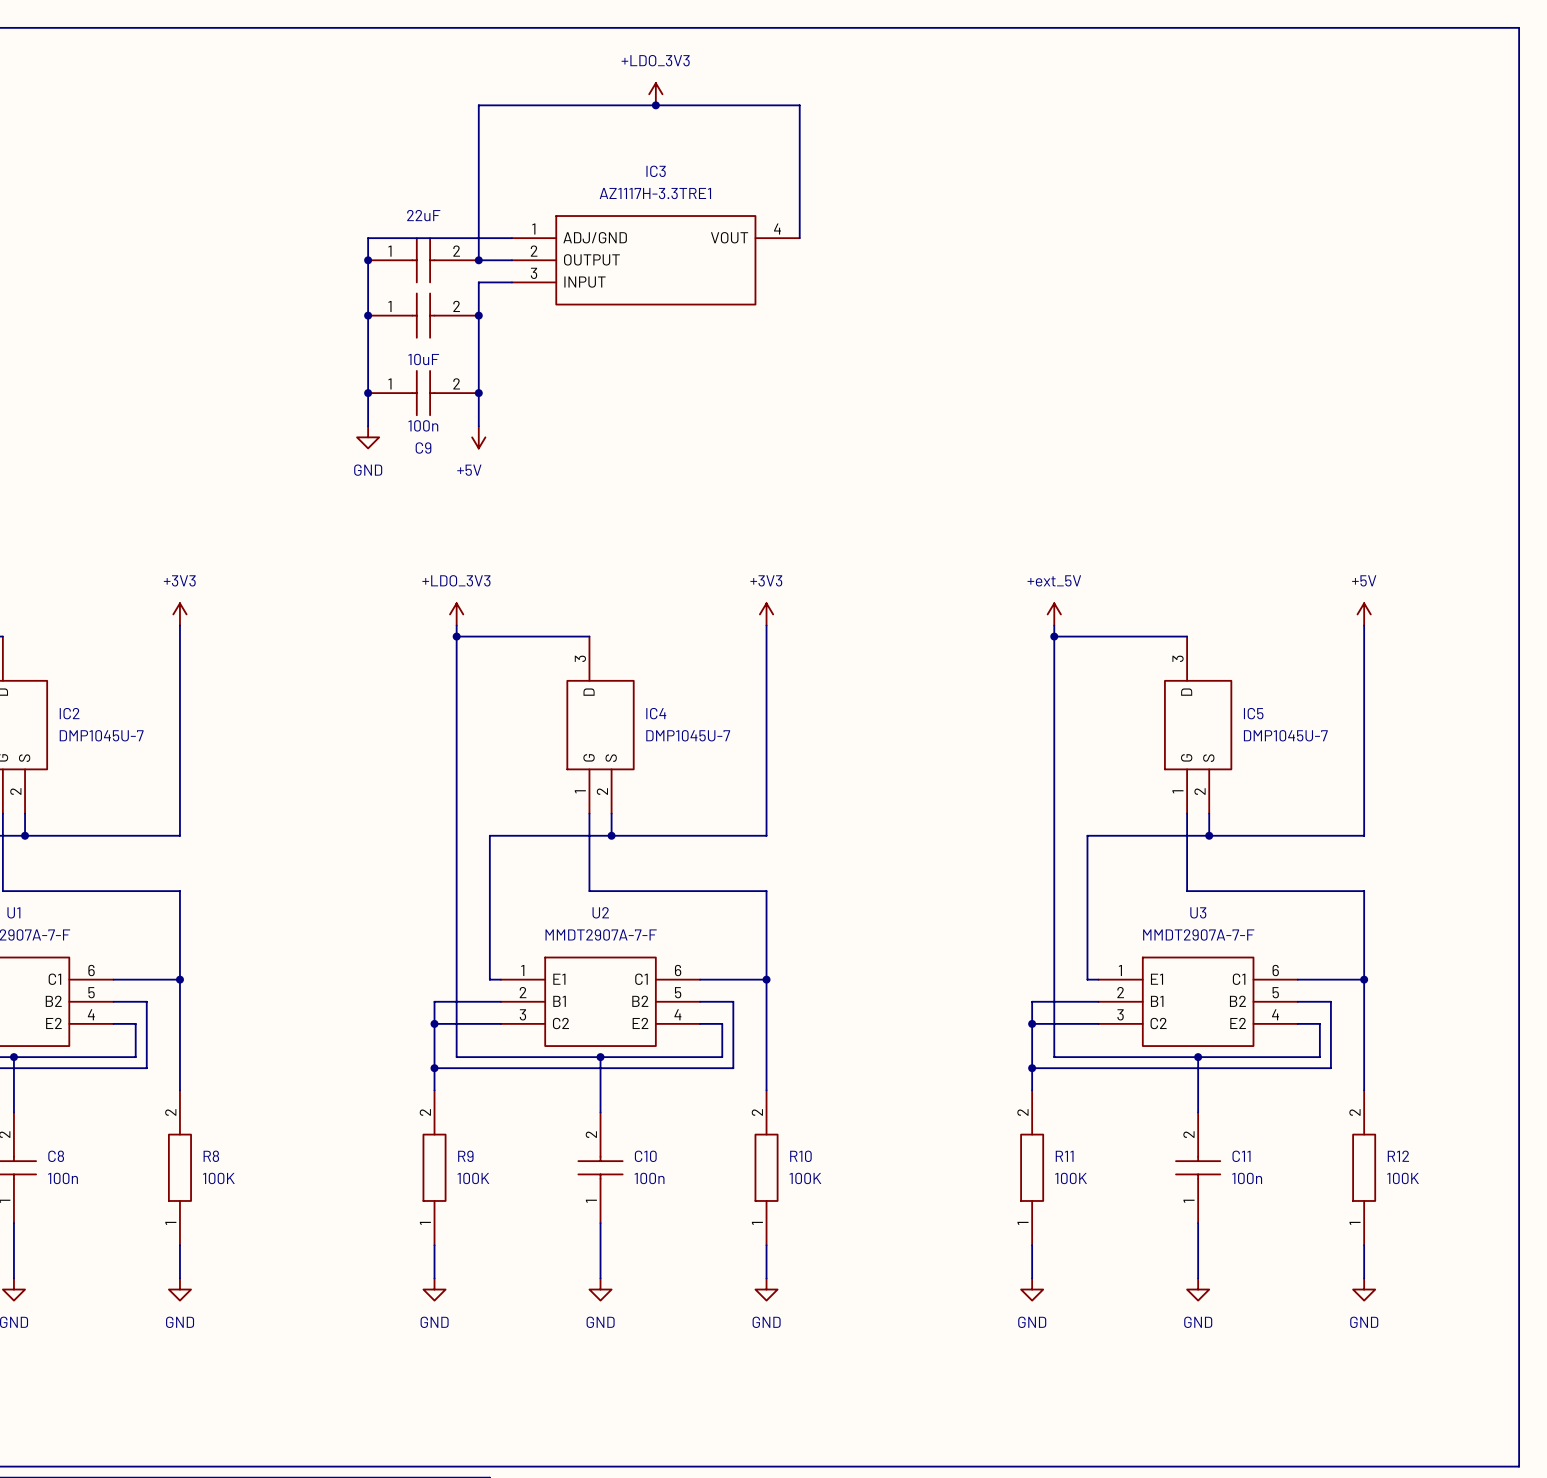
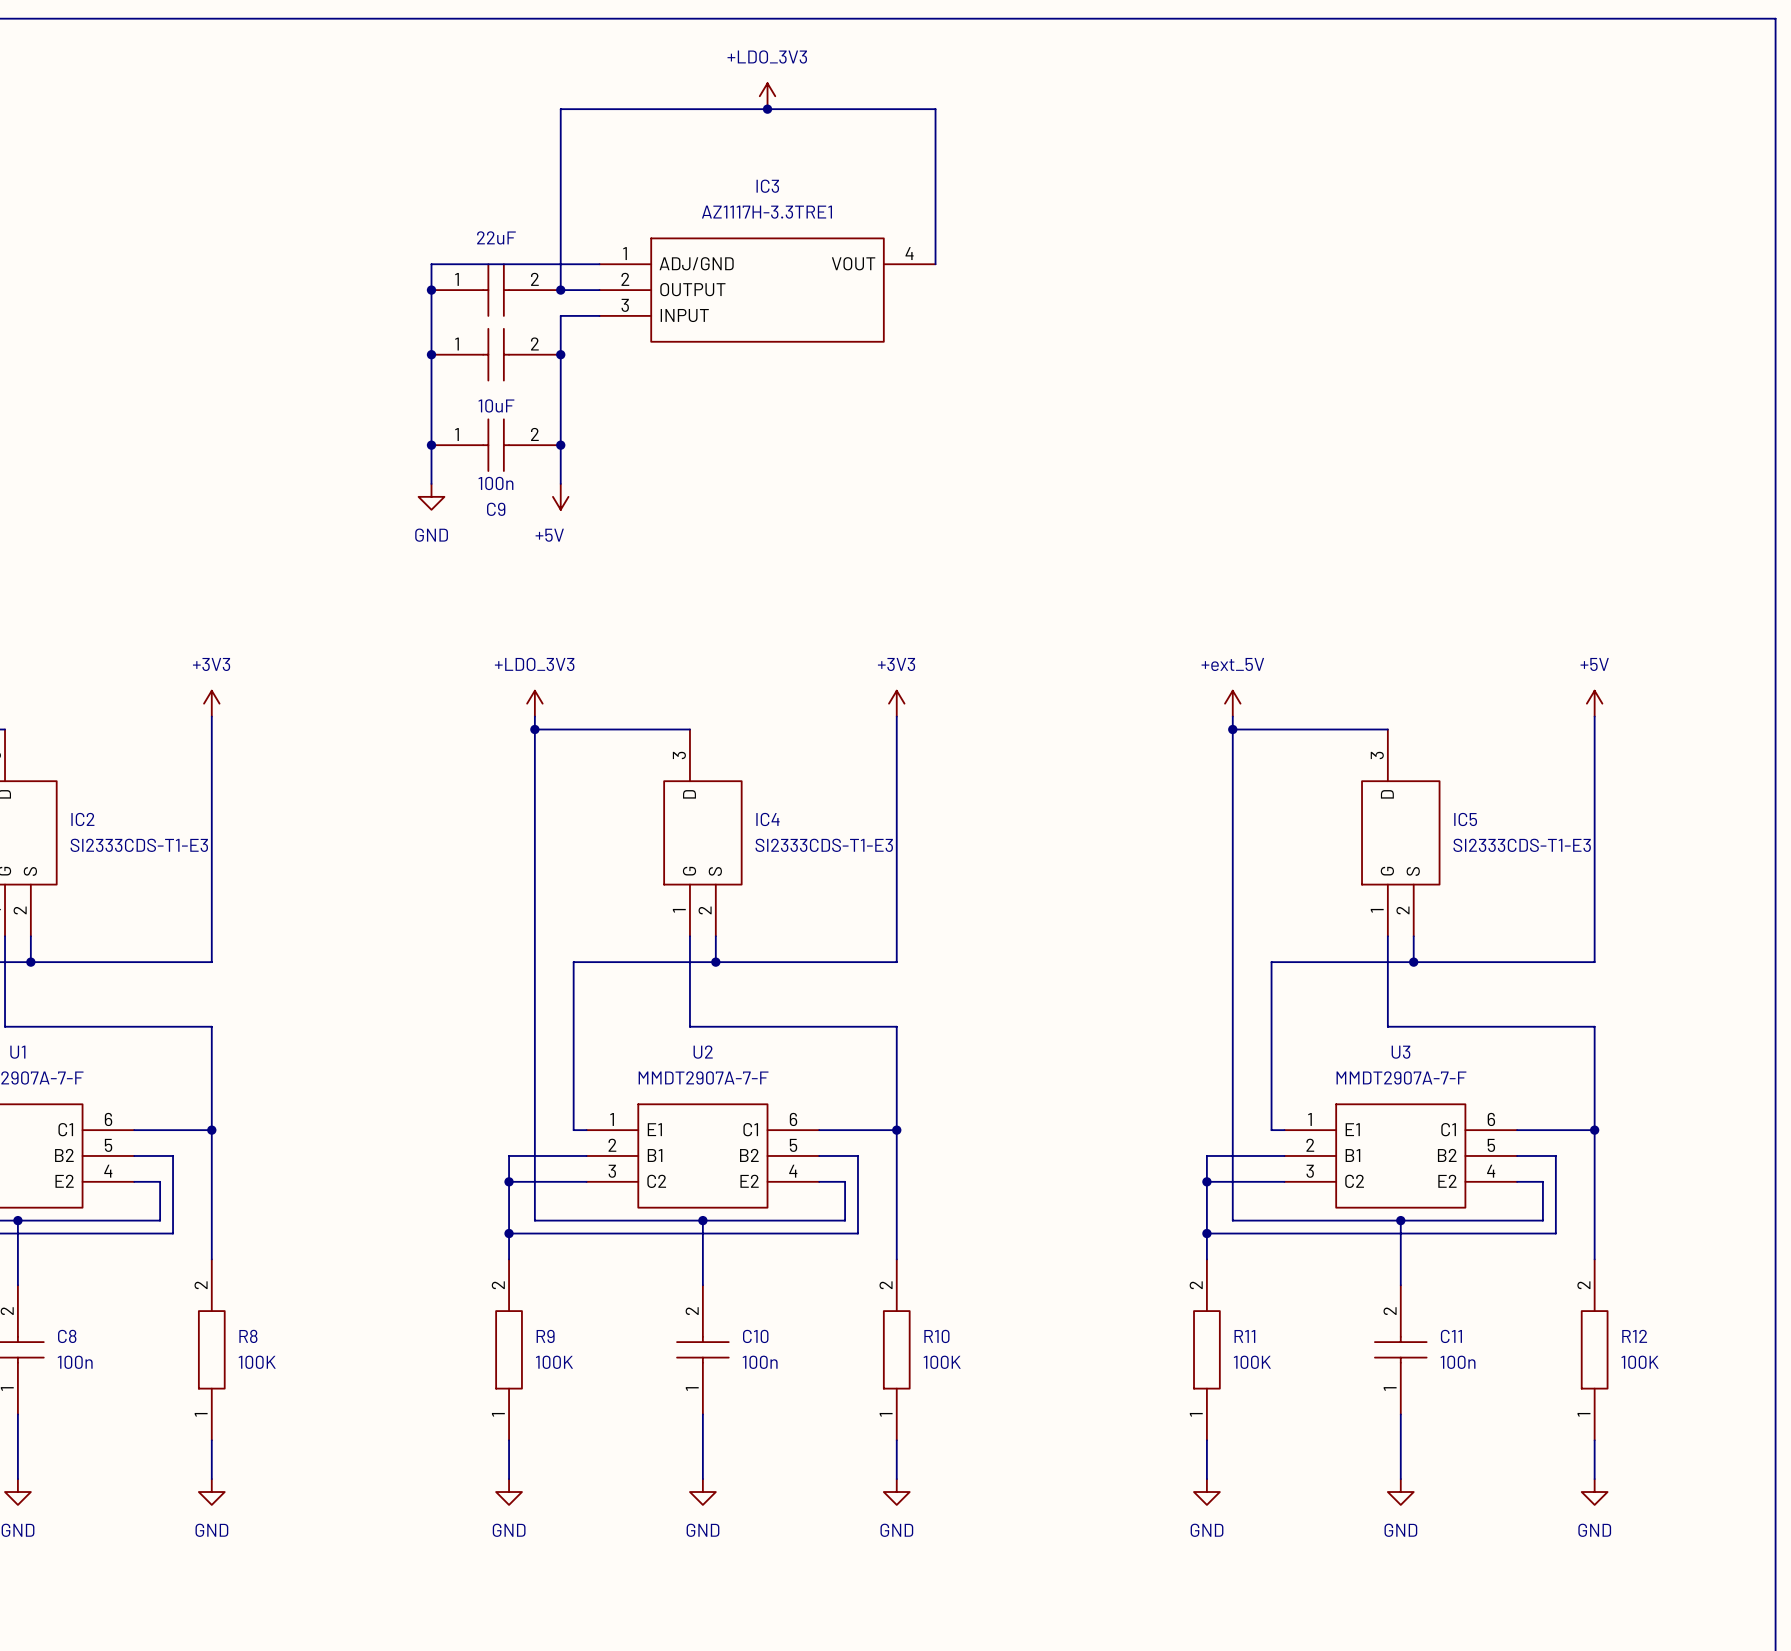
IC2 value: DMP1045U-7 (101, 735) -> SI2333CDS-T1-E3 (139, 845)
IC4 value: DMP1045U-7 (688, 735) -> SI2333CDS-T1-E3 (824, 845)
IC5 value: DMP1045U-7 (1285, 735) -> SI2333CDS-T1-E3 (1522, 845)

